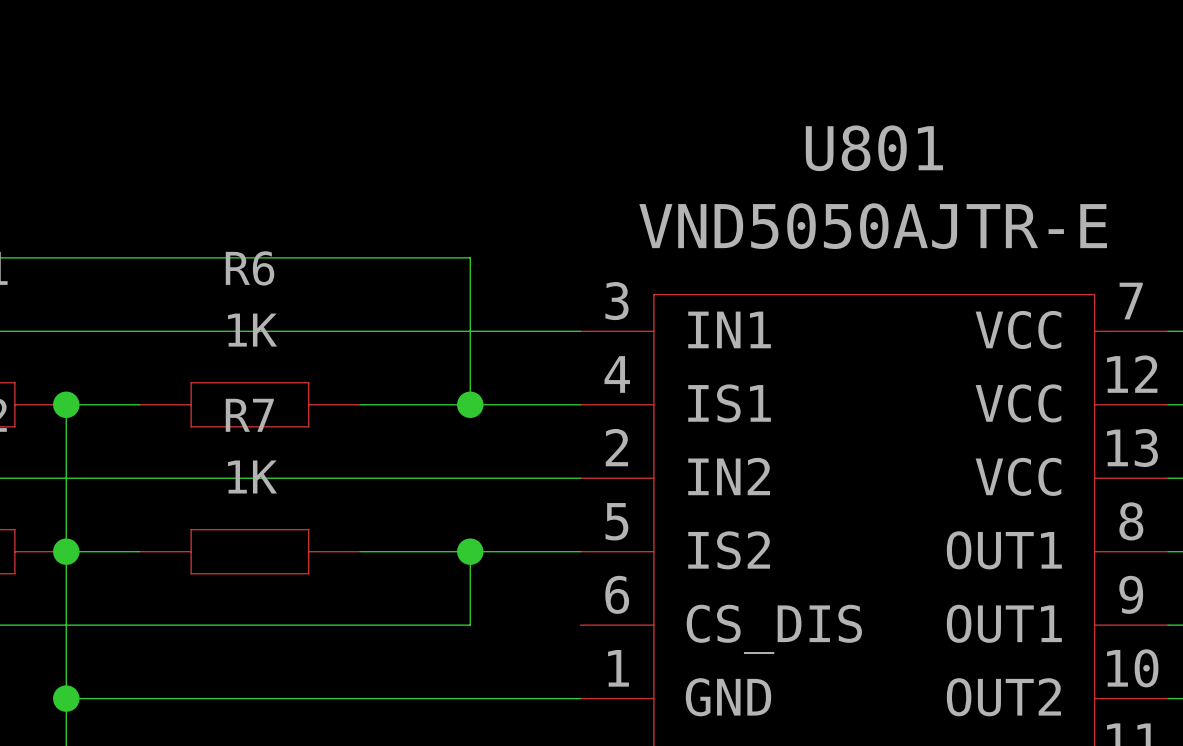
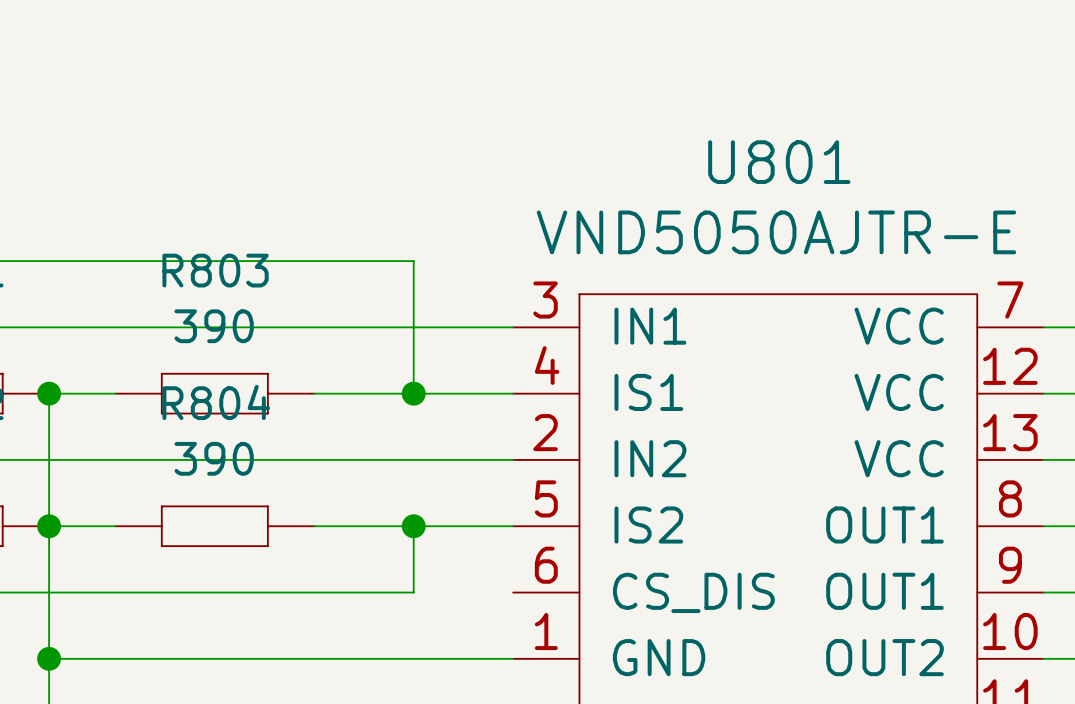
R6 name: R6 (250, 268) -> R803 (215, 270)
R6 value: 1K (252, 330) -> 390 (214, 326)
R7 name: R7 (249, 415) -> R804 (216, 402)
R7 value: 1K (252, 477) -> 390 (214, 458)

